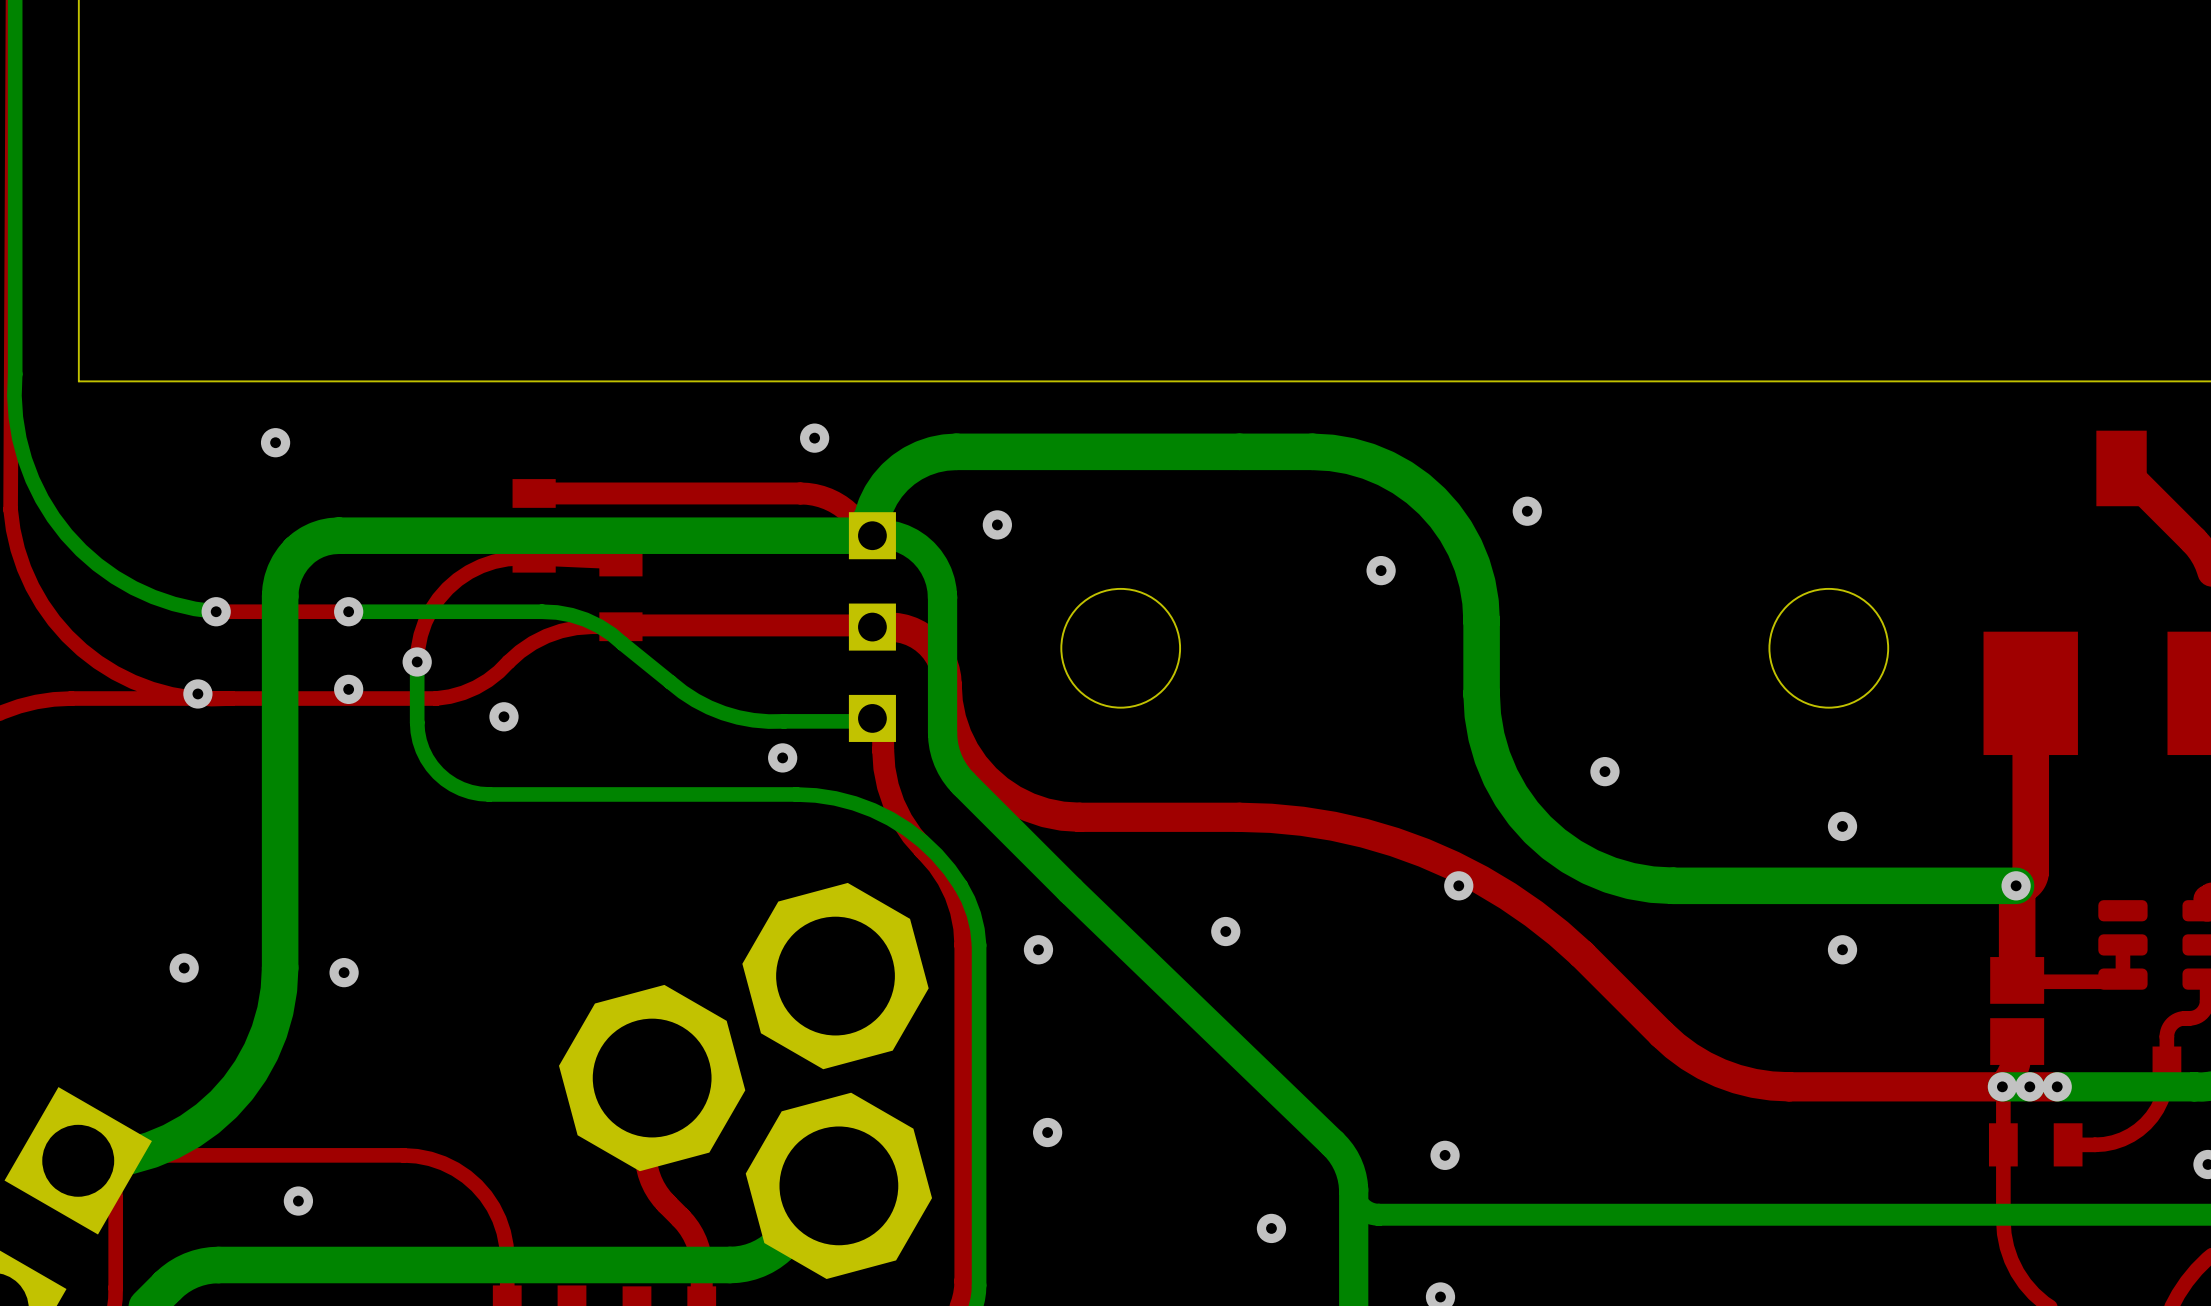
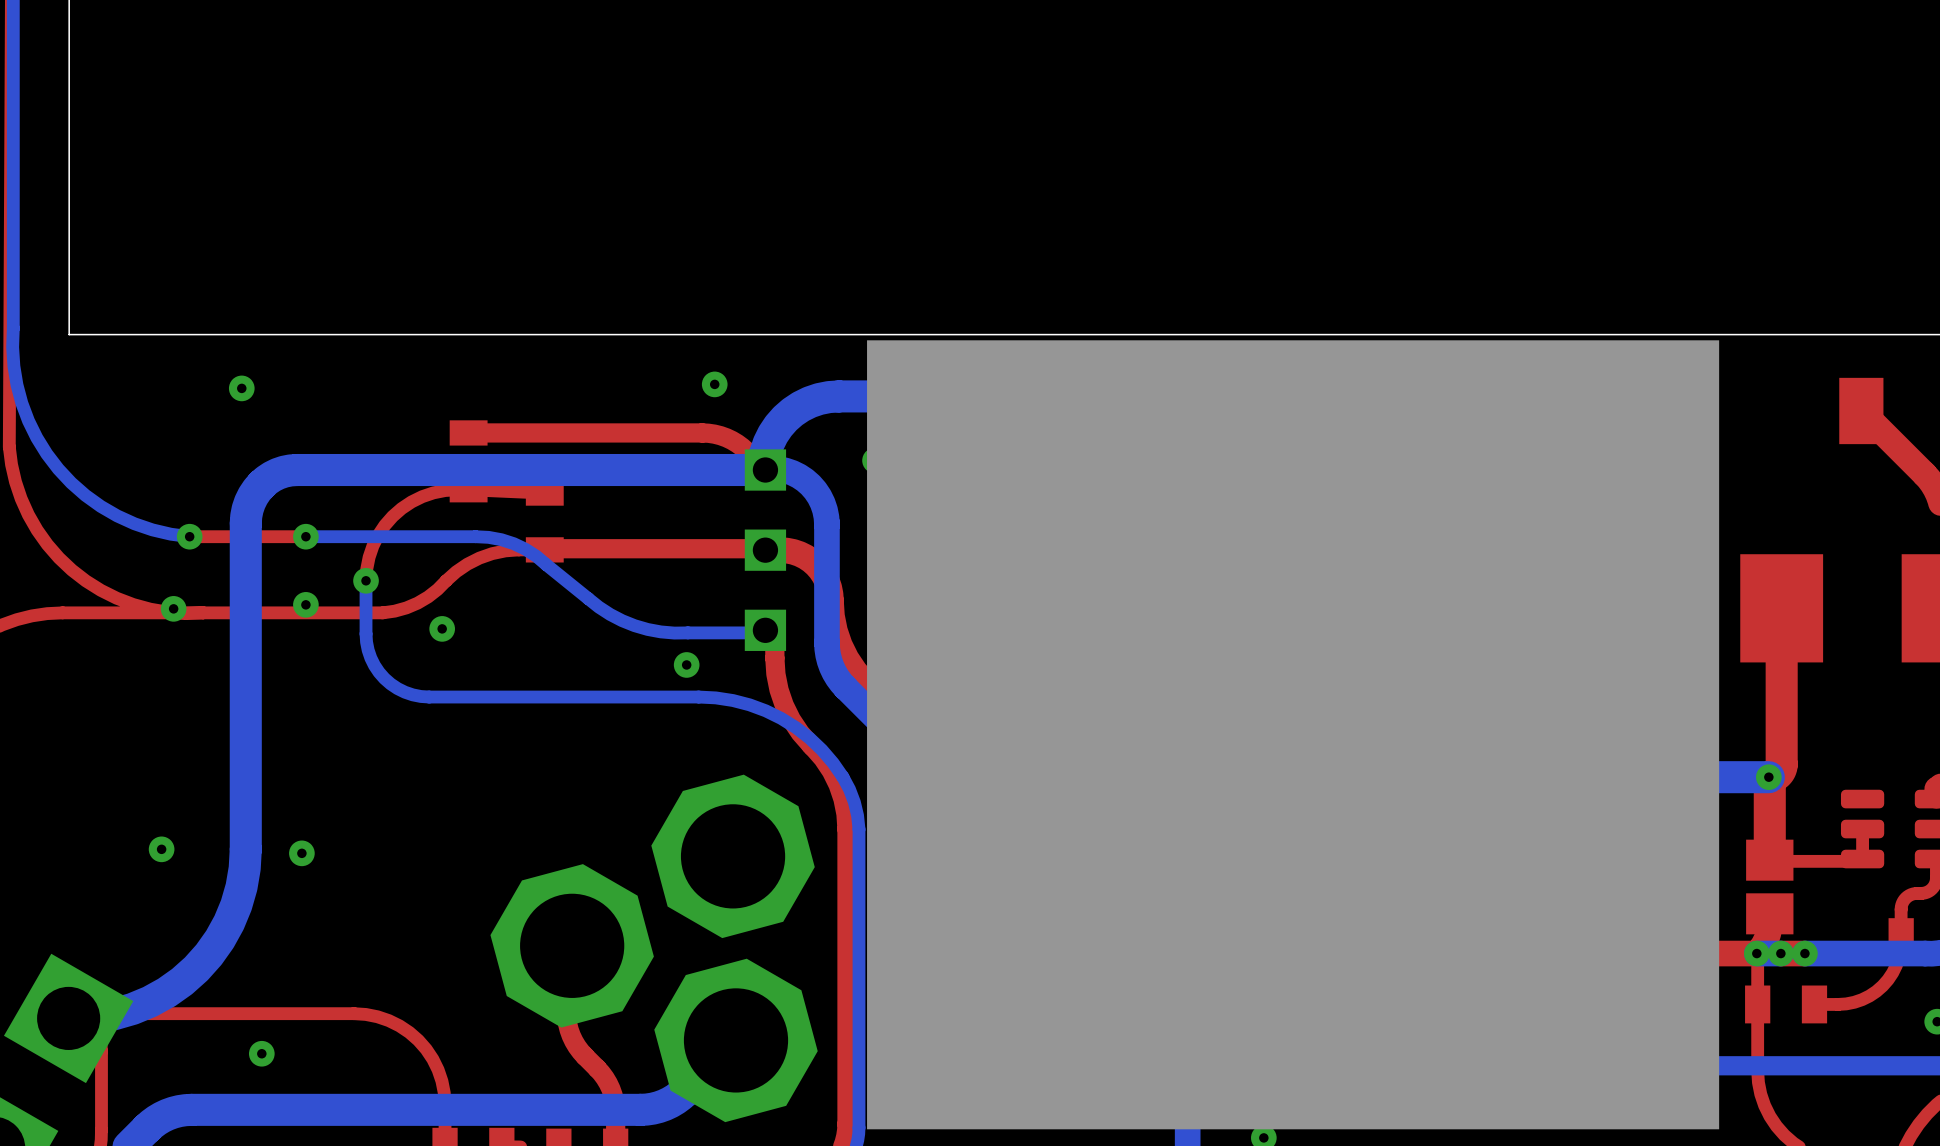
drawing: none -> [867, 340, 1720, 1130]

